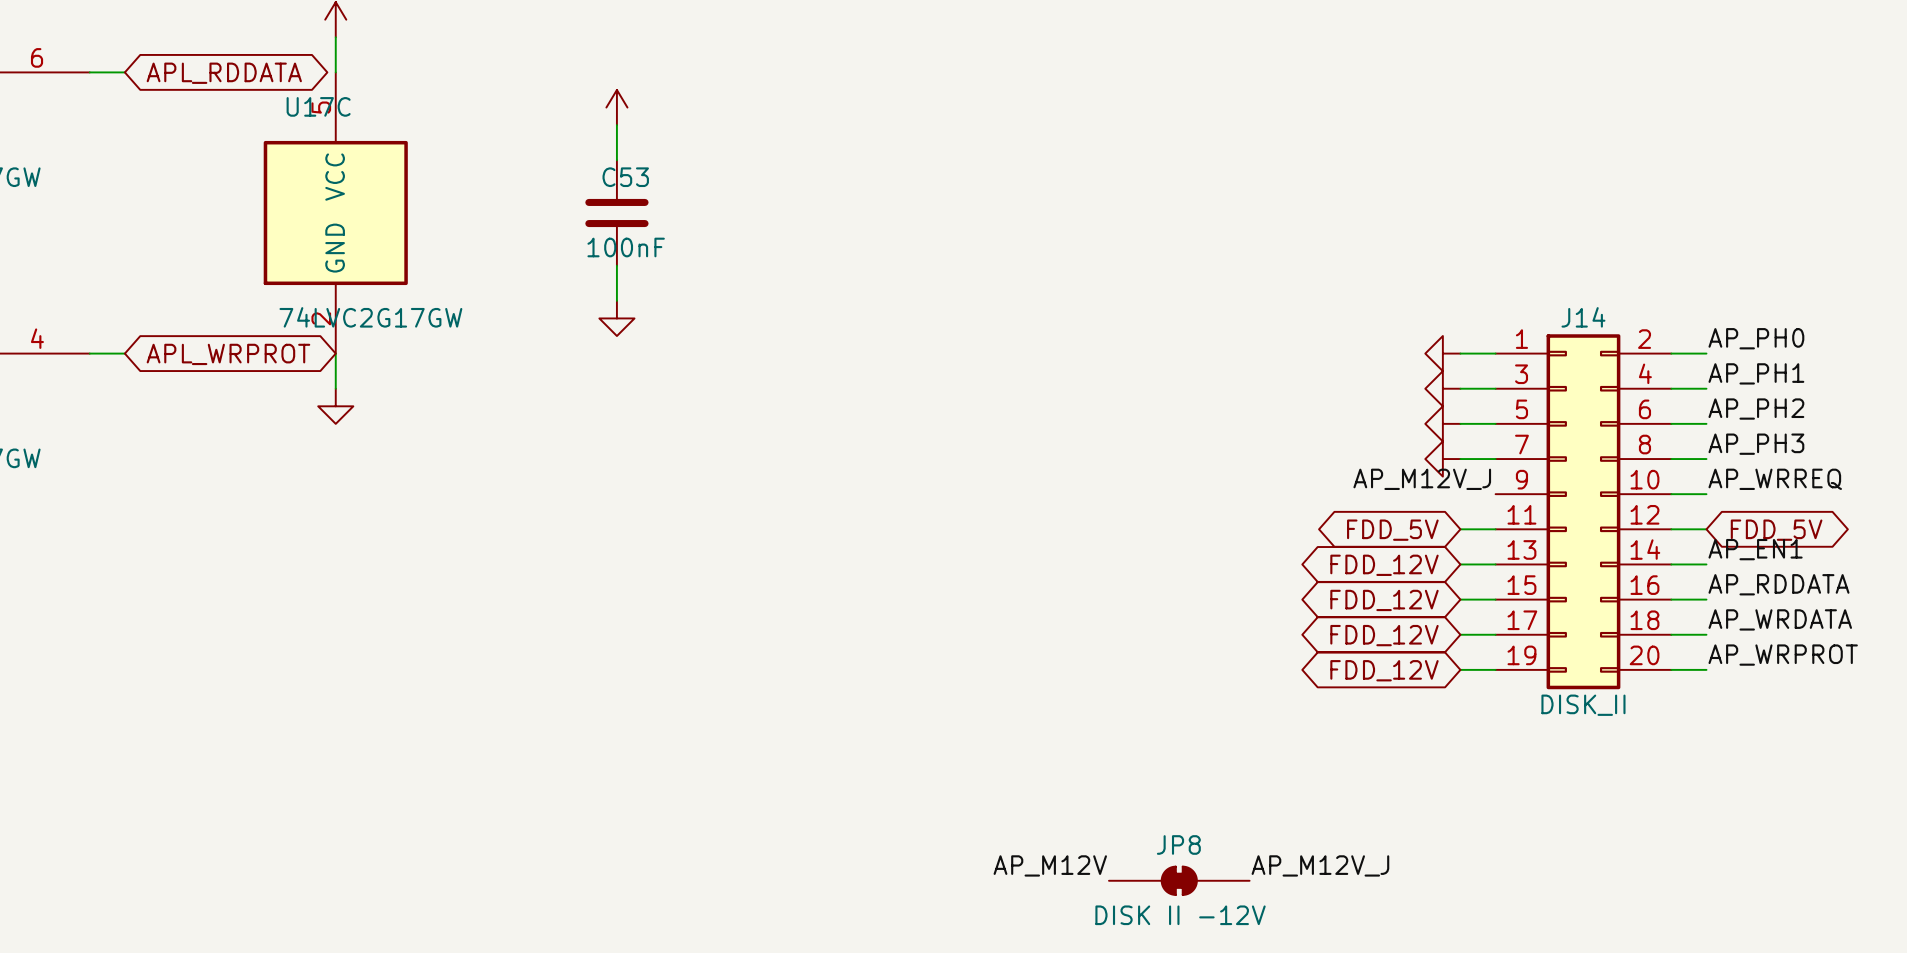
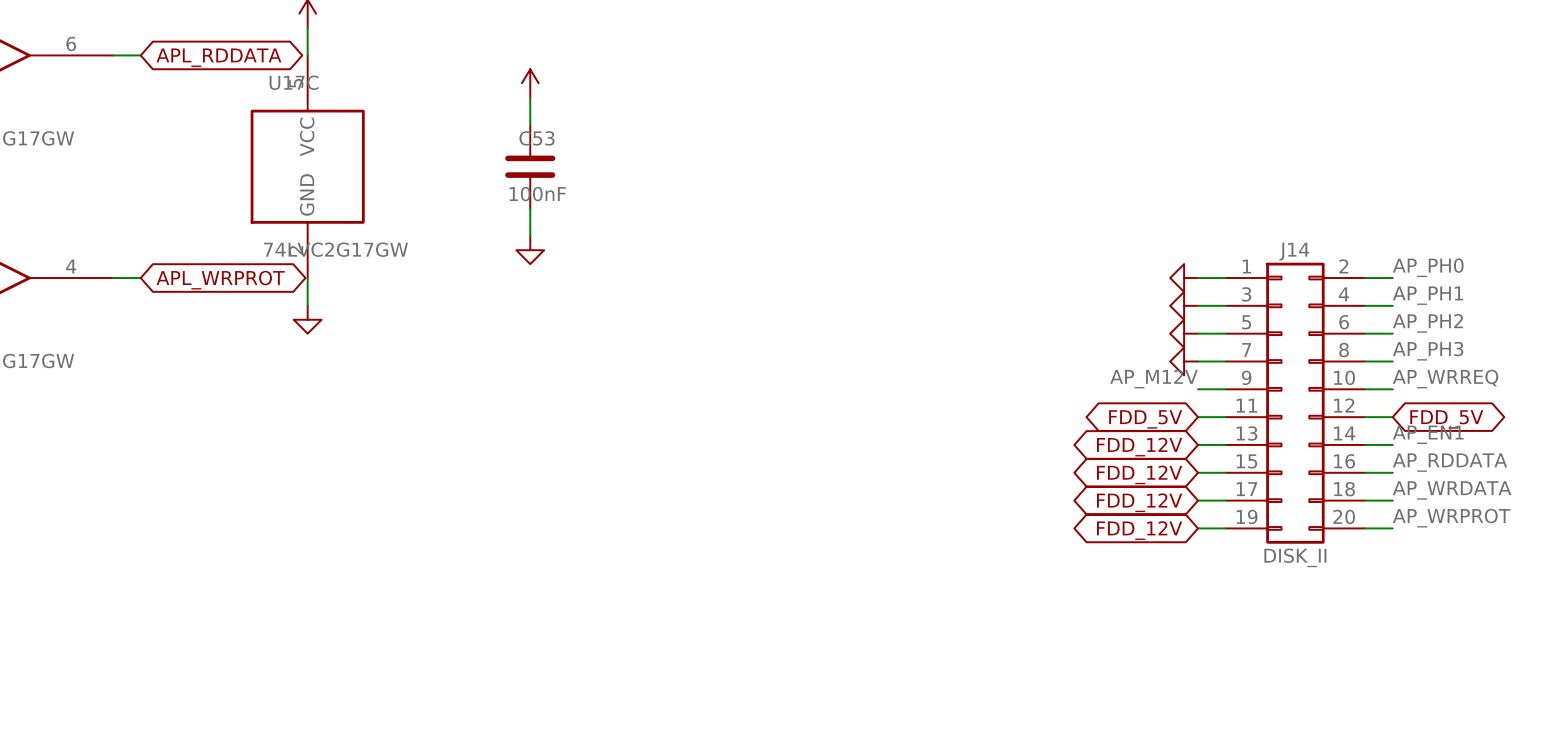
label: AP_M12V_J (1422, 479) -> AP_M12V (1154, 379)
wire: none -> (1198, 389) (1225, 389)
label: AP_M12V (1050, 865) -> none
label: AP_M12V_J (1320, 865) -> none
JP8: DISK II -12V (1179, 880) -> none

